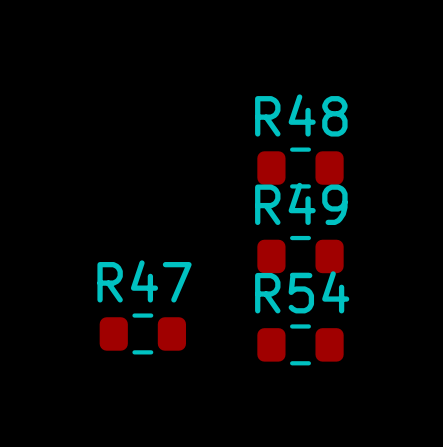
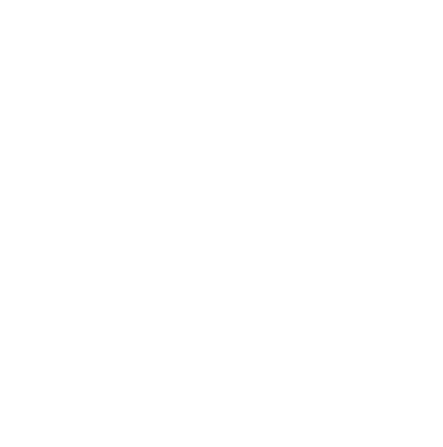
R48: (300, 168) -> none
R49: (300, 256) -> none
R47: (142, 333) -> none
R54: (300, 344) -> none

